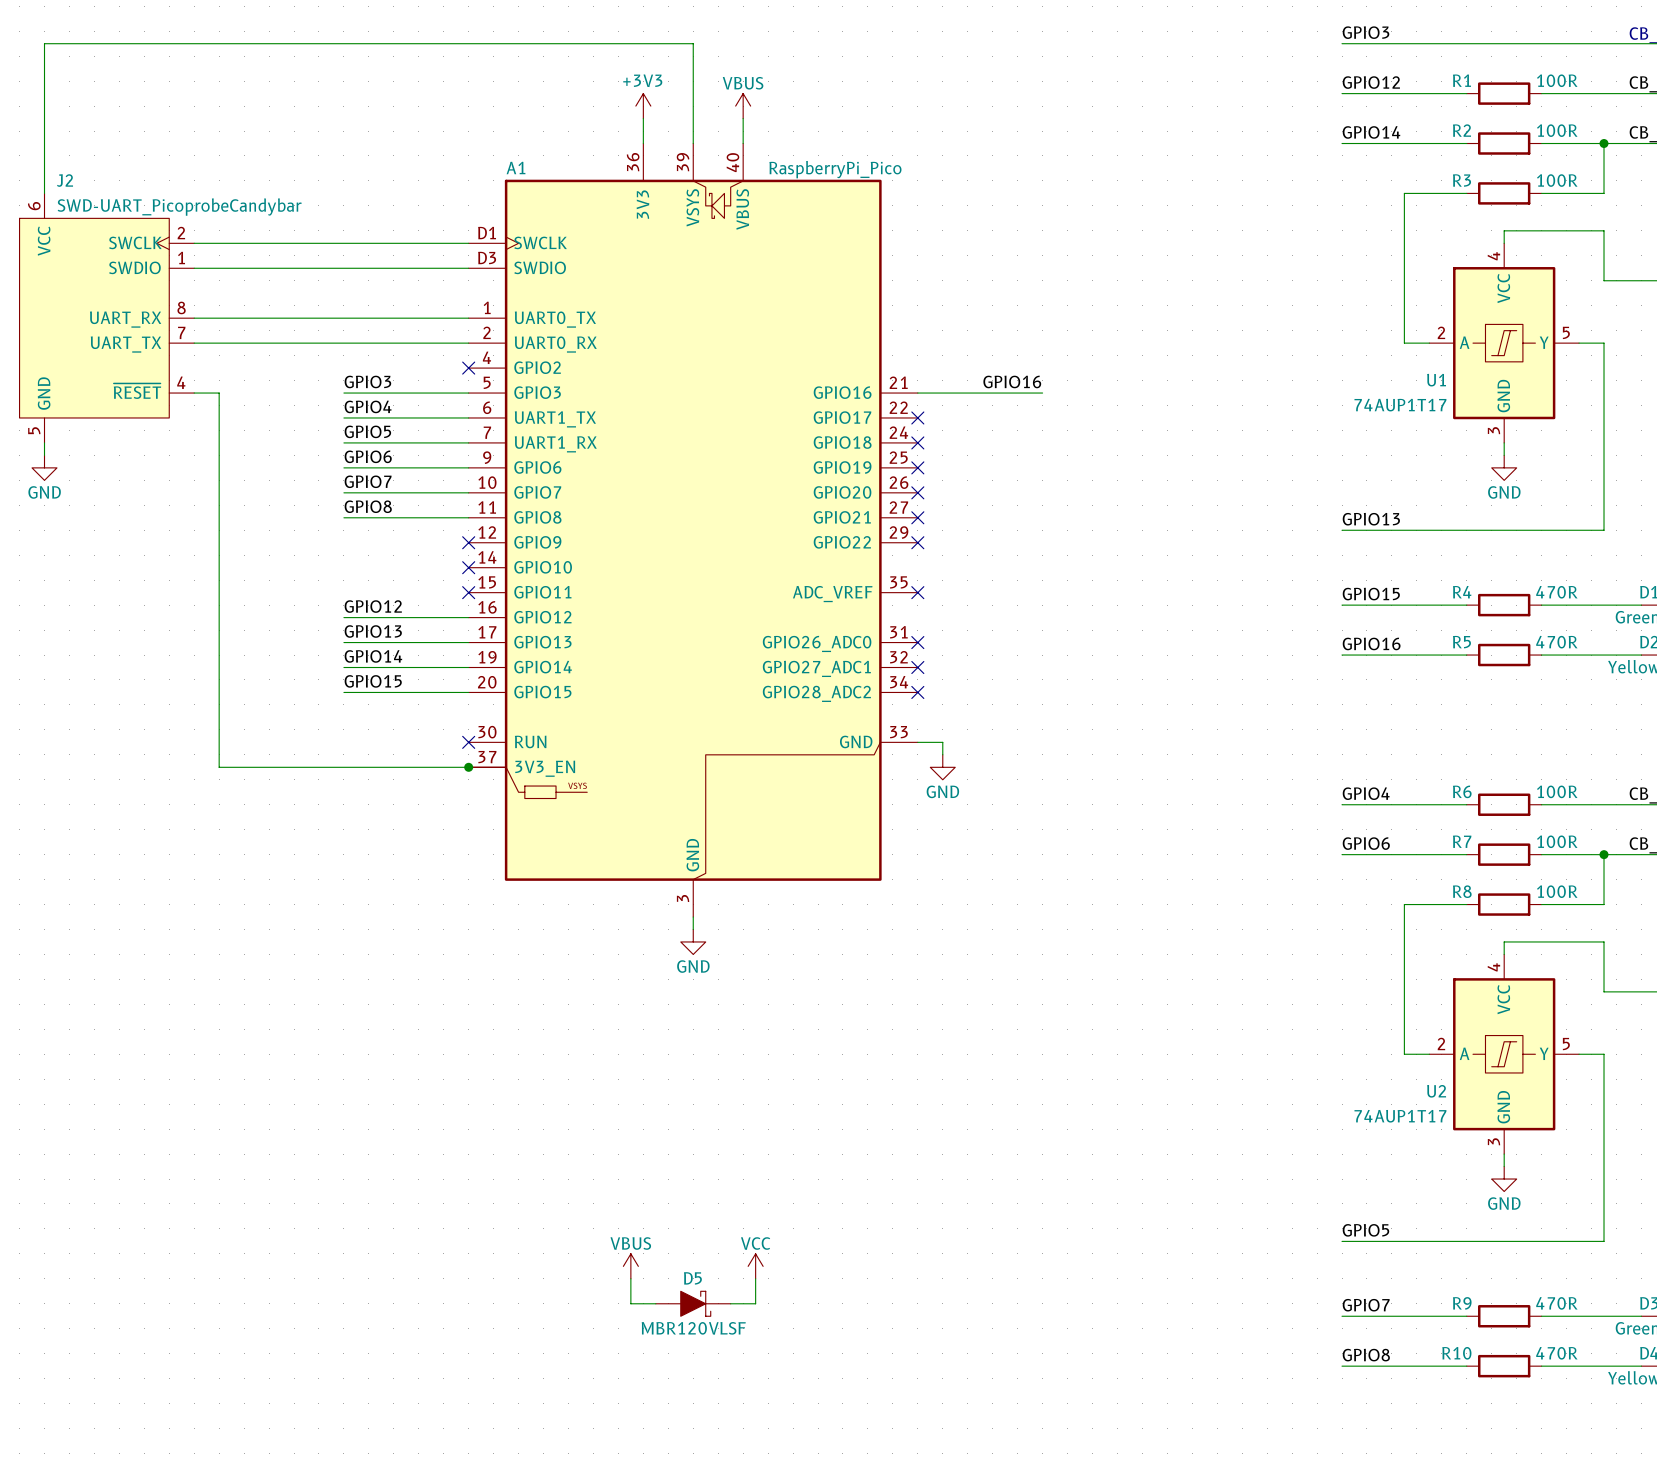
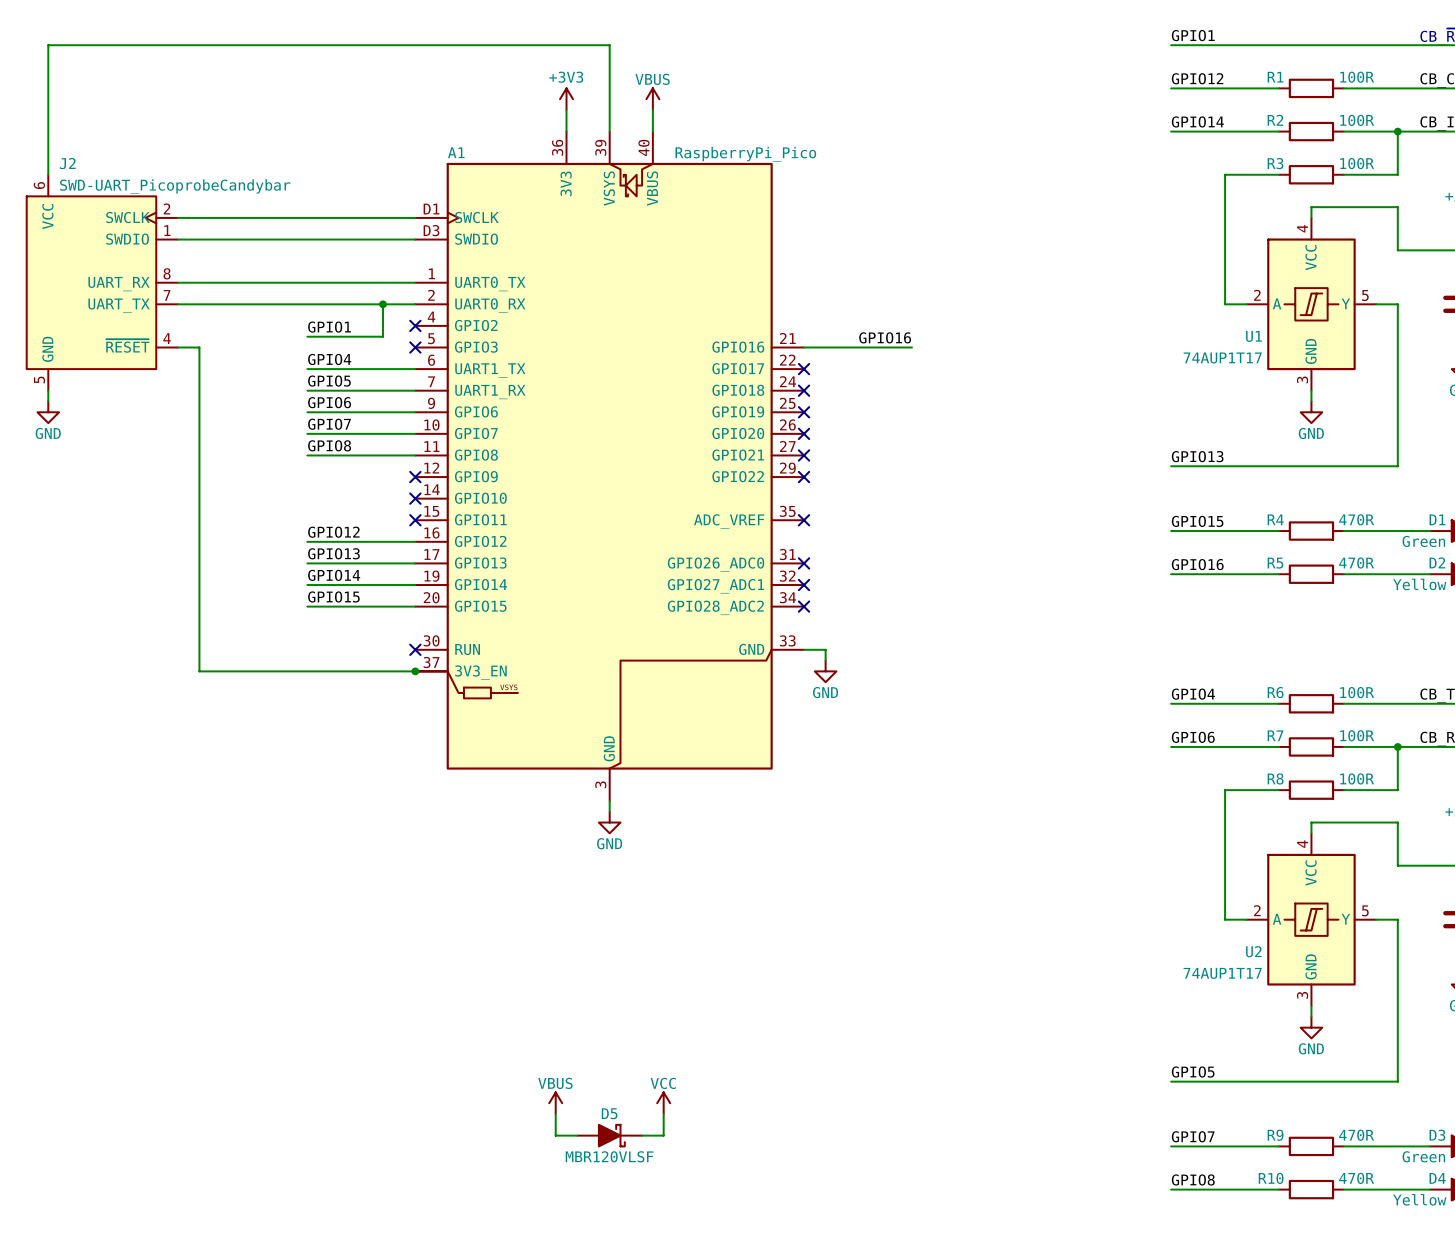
label: GPIO3 (1366, 32) -> GPIO1 (1193, 35)
wire: none -> (382, 304) (382, 336) (307, 336)
junction: none -> (382, 304)
label: GPIO3 (367, 381) -> GPIO1 (329, 327)
wire: (343, 393) (468, 393) -> none
no-connect mark: none -> (415, 347)

